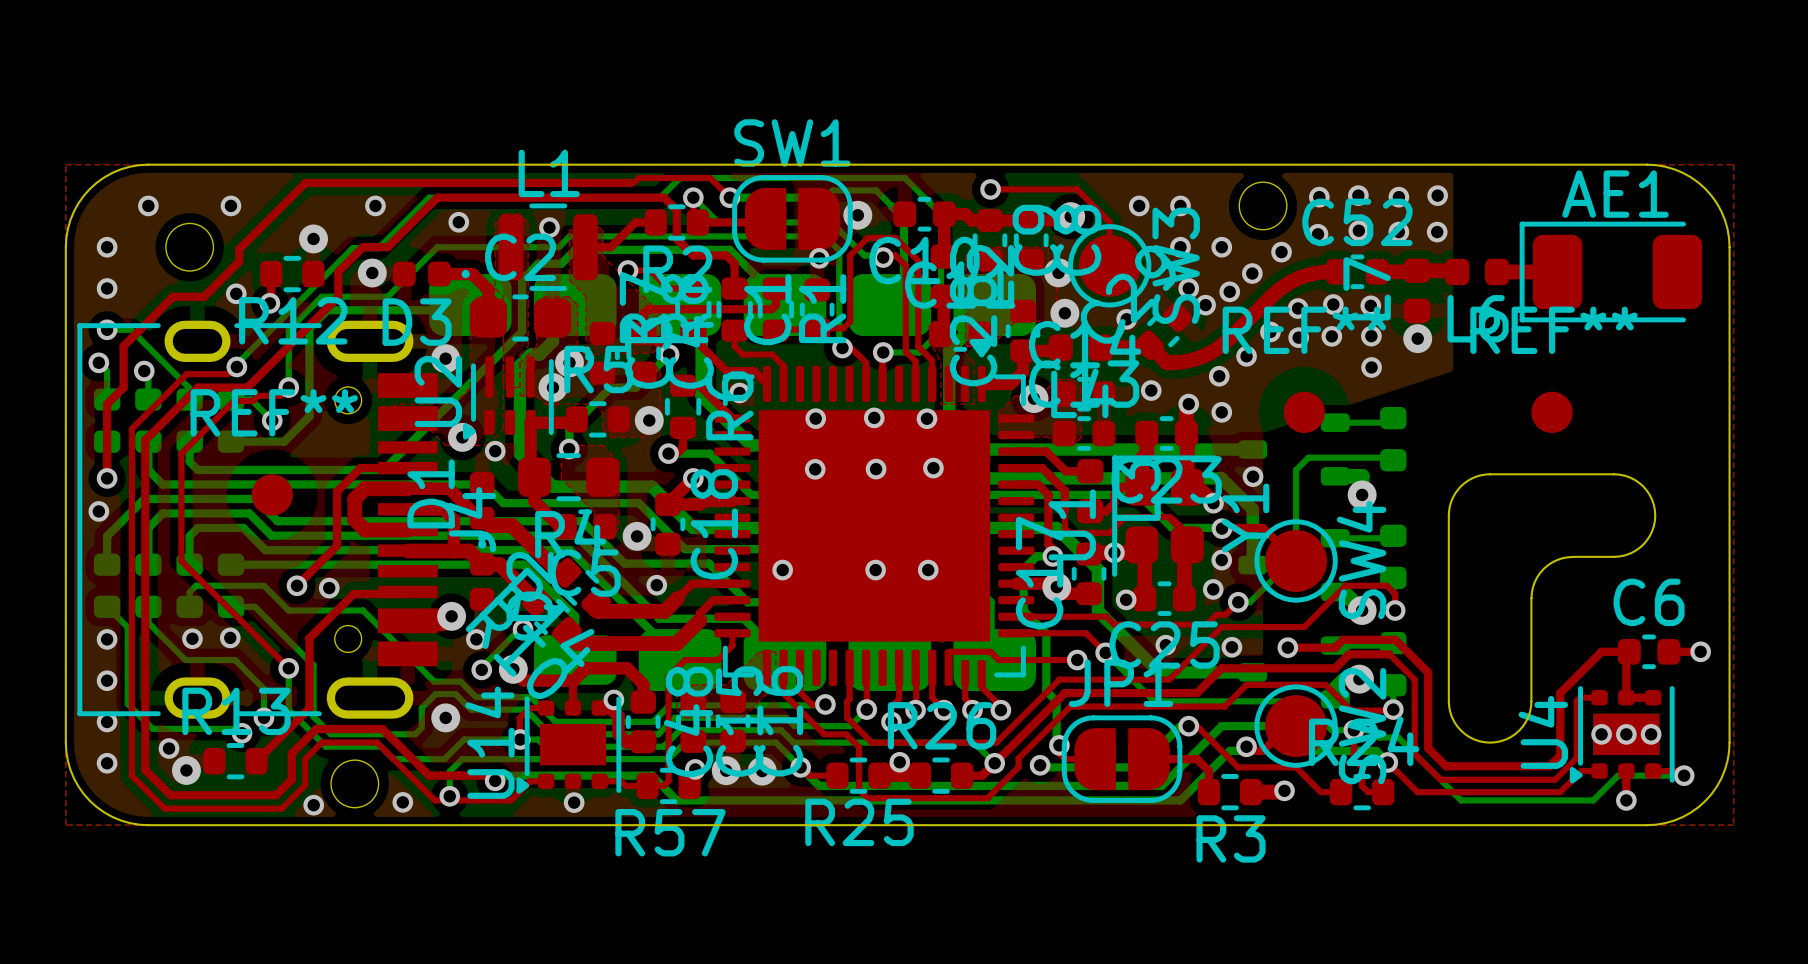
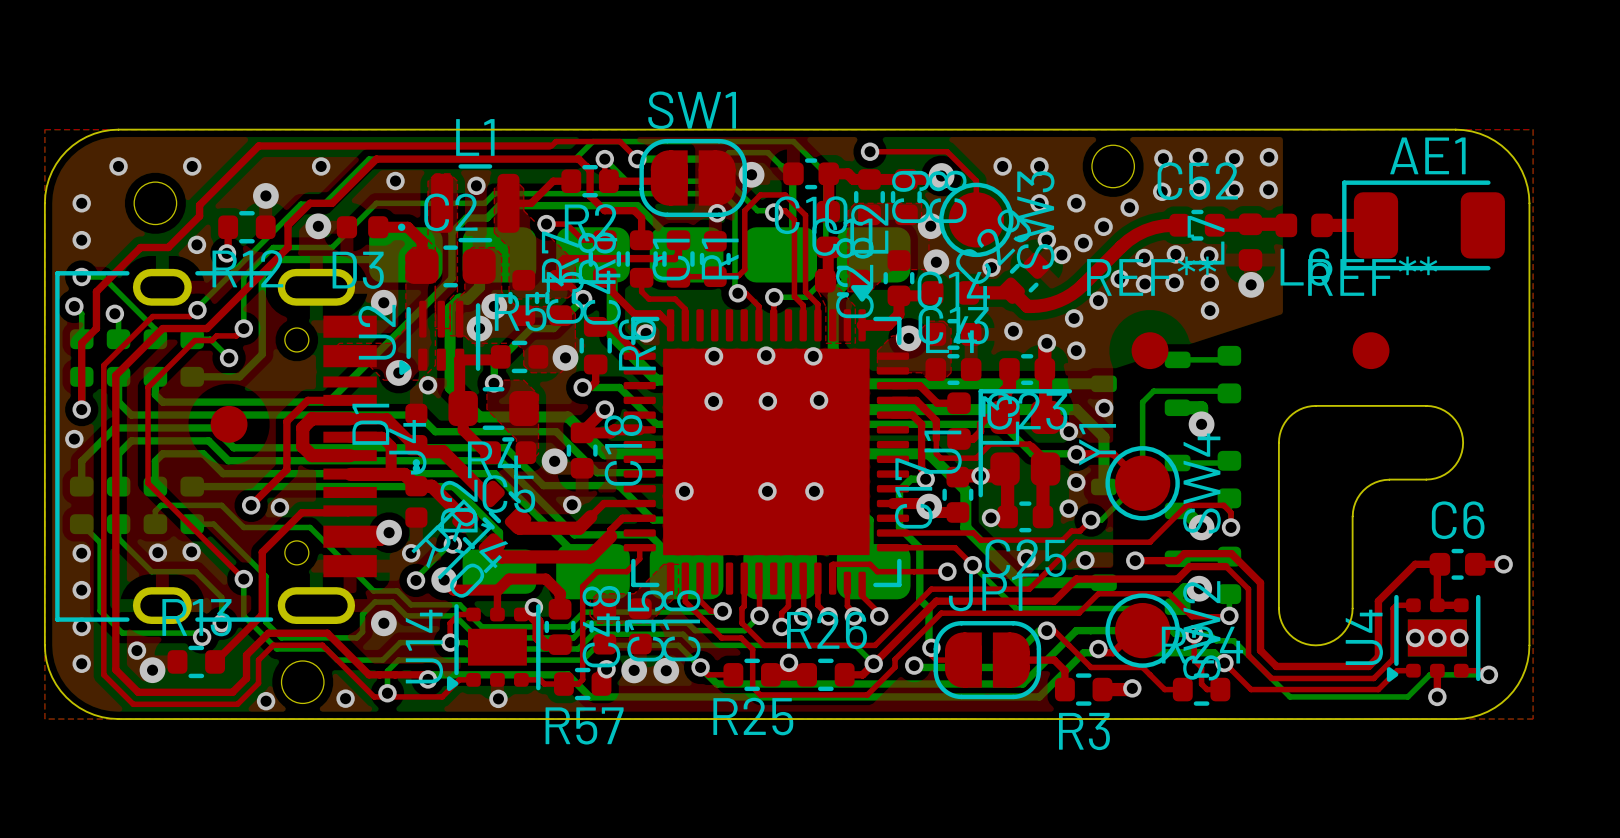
REF** name: REF** (274, 412) -> none

